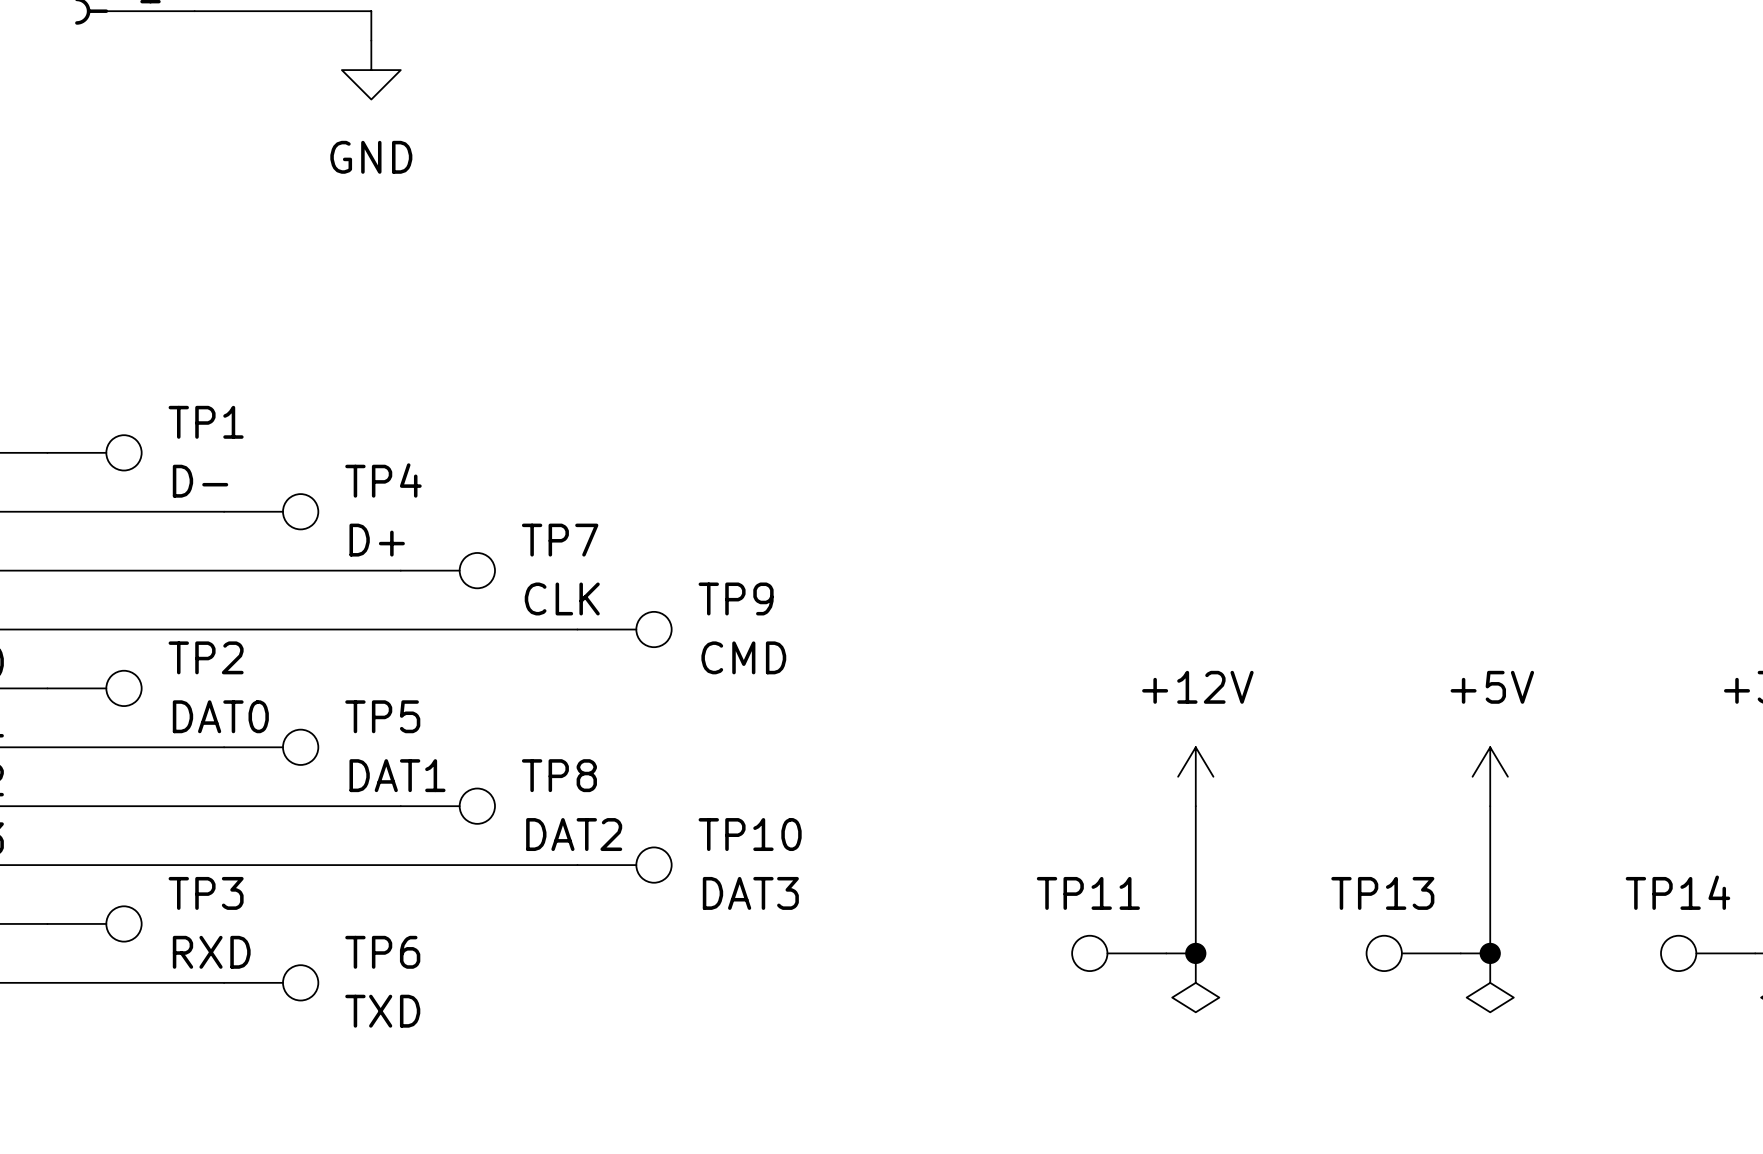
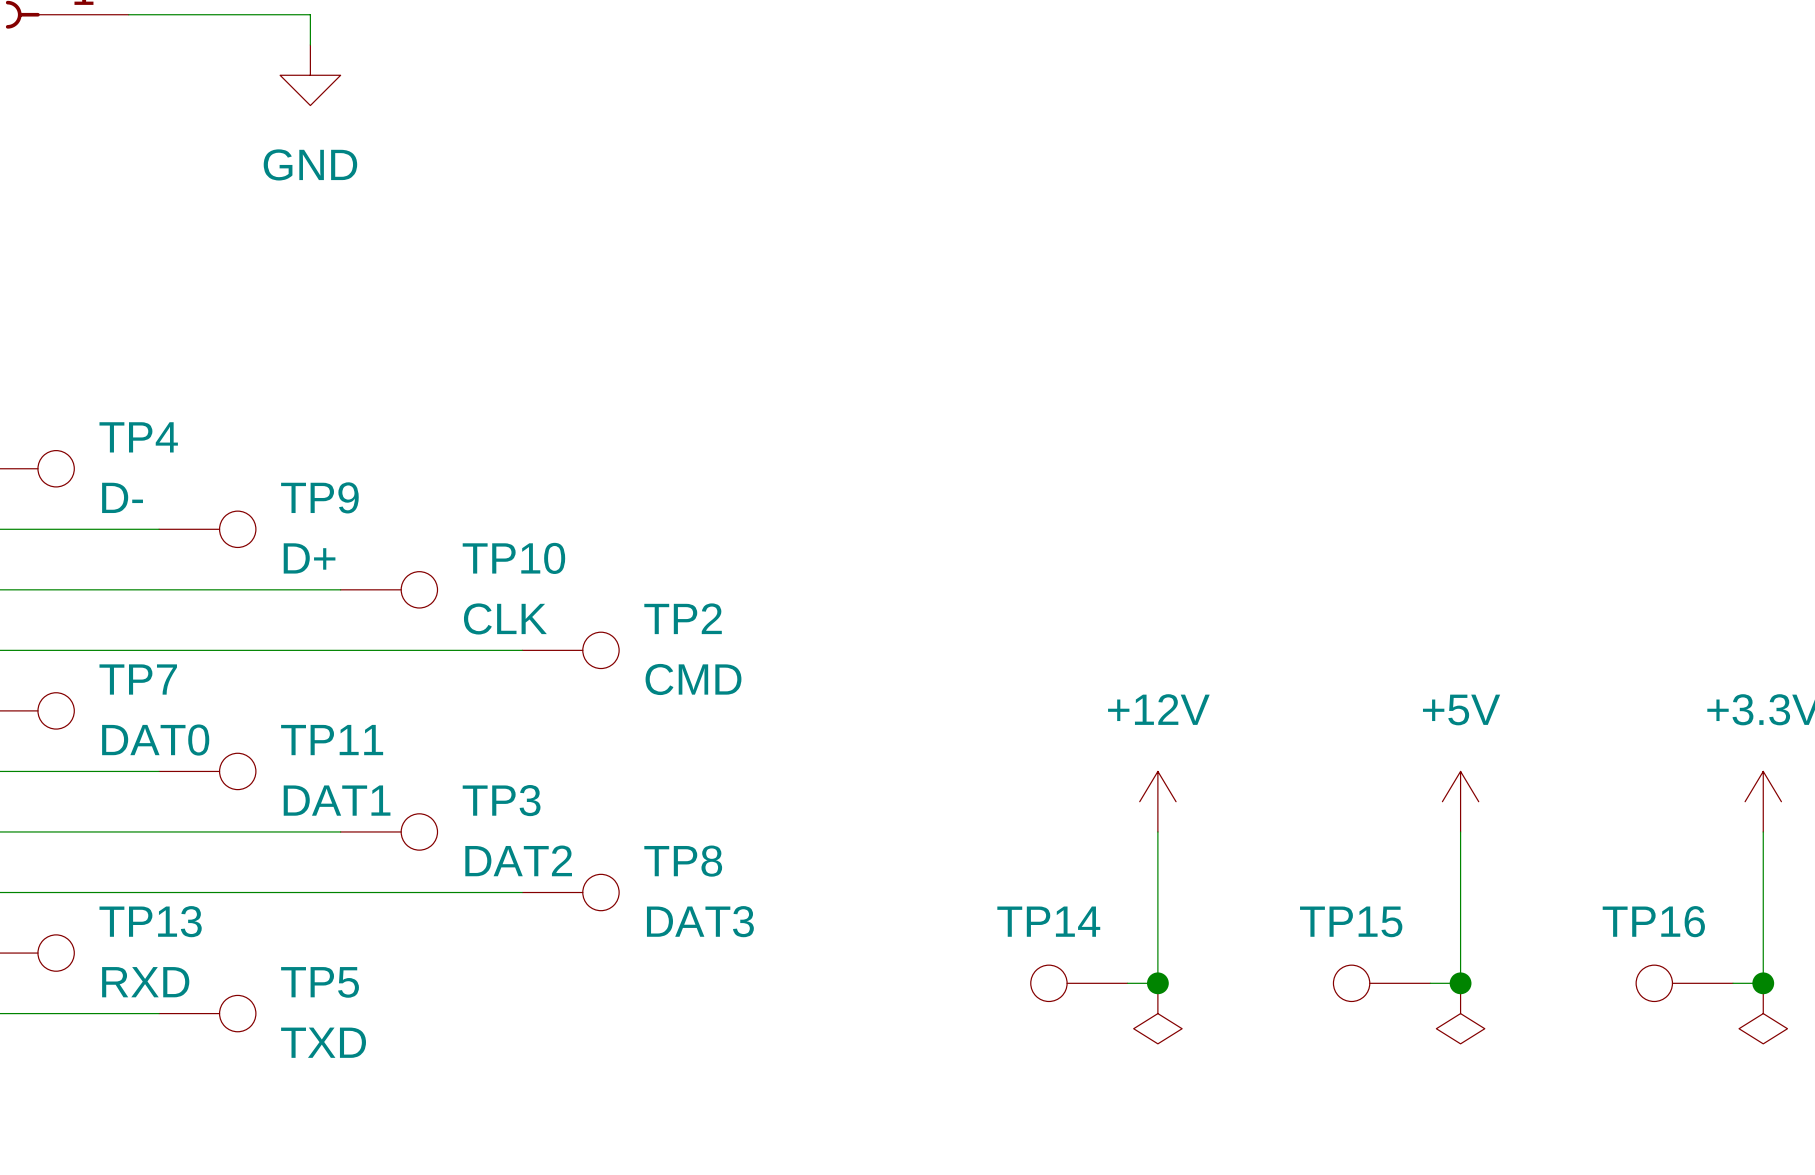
TP1 name: TP1 (206, 422) -> TP4 (138, 437)
TP4 name: TP4 (383, 480) -> TP9 (319, 497)
TP7 name: TP7 (560, 540) -> TP10 (513, 558)
TP9 name: TP9 (736, 598) -> TP2 (683, 618)
TP2 name: TP2 (206, 657) -> TP7 (138, 679)
TP5 name: TP5 (382, 716) -> TP11 (332, 740)
TP8 name: TP8 (559, 775) -> TP3 (501, 800)
TP10 name: TP10 (750, 834) -> TP8 (683, 861)
TP14 name: TP14 (1677, 892) -> TP16 (1653, 921)
TP3 name: TP3 (206, 893) -> TP13 (150, 921)
TP11 name: TP11 (1088, 893) -> TP14 (1048, 921)
TP13 name: TP13 (1382, 893) -> TP15 (1351, 921)
TP6 name: TP6 (382, 952) -> TP5 (320, 982)

